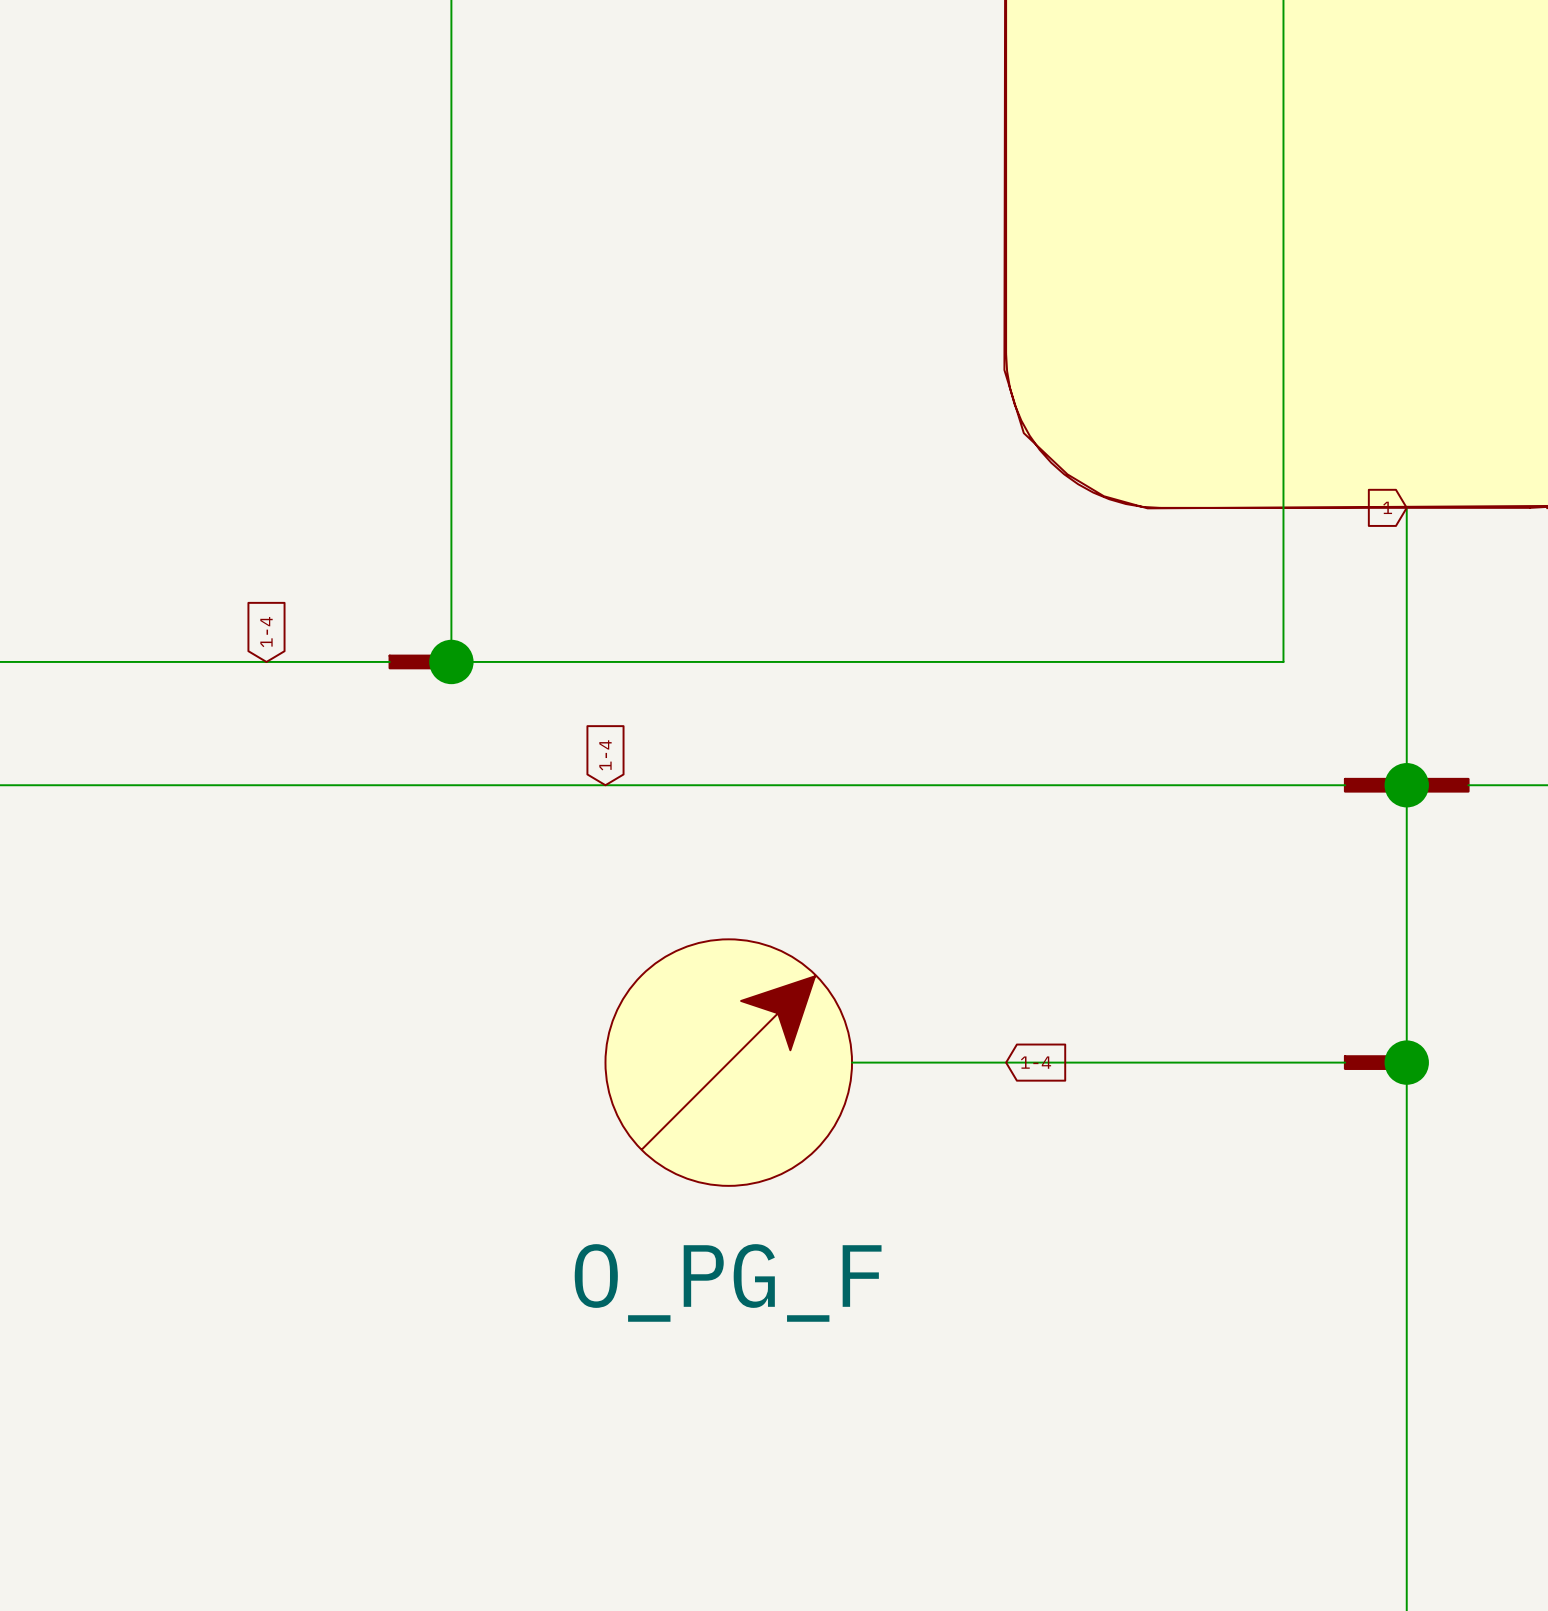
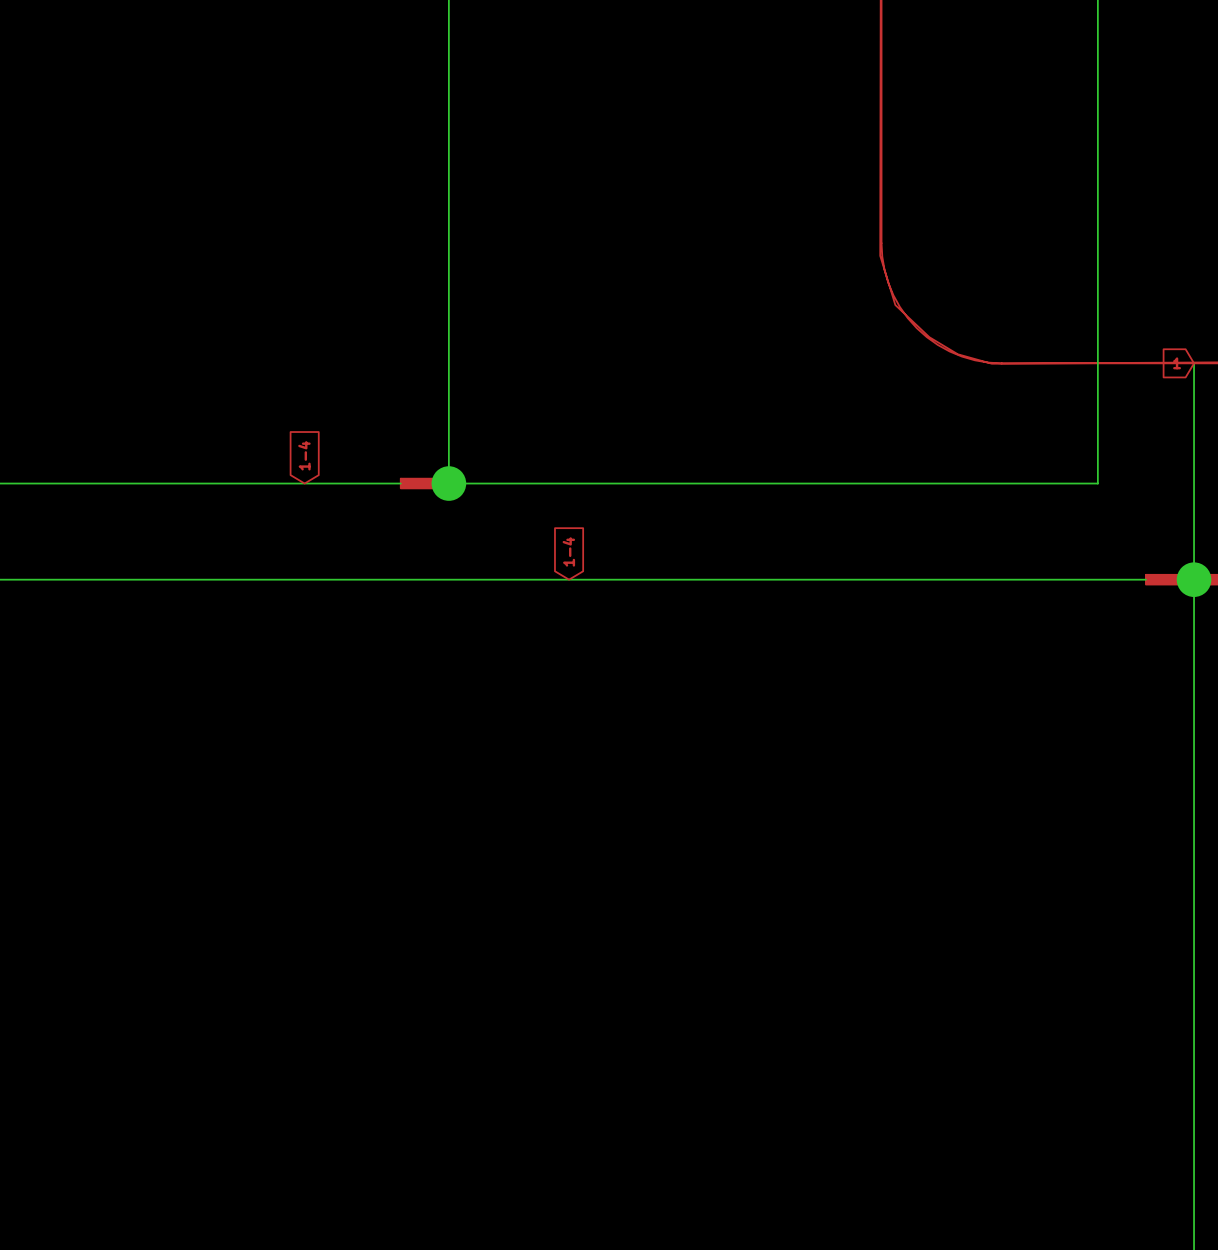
part: (728, 1062) -> none
wire: (852, 1062) (1345, 1062) -> none
global label: 1-4 (1036, 1062) -> none
part: (1375, 1062) -> none
junction: (1406, 1062) -> none

